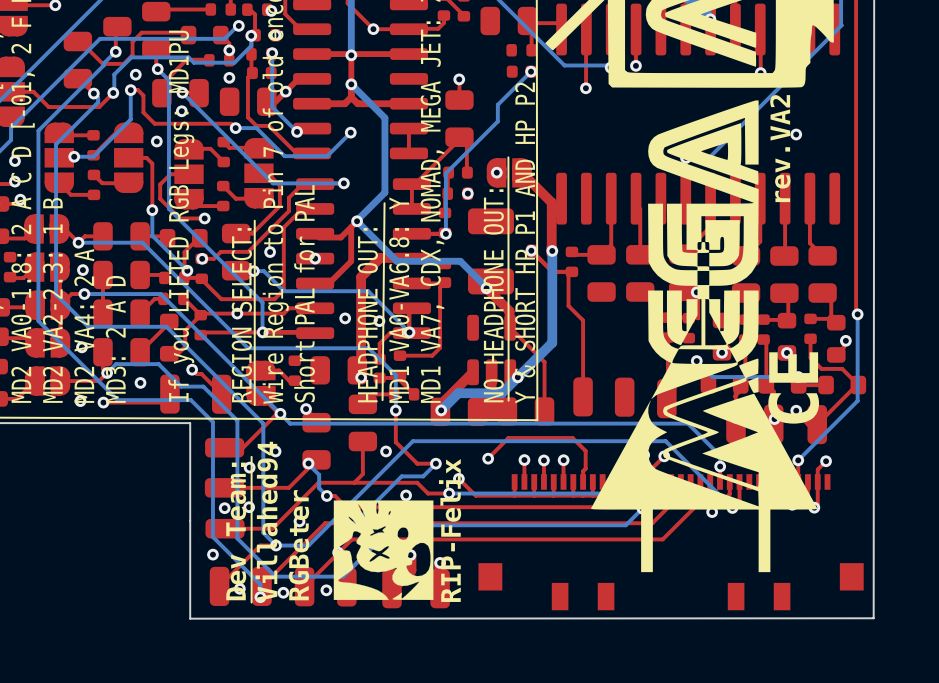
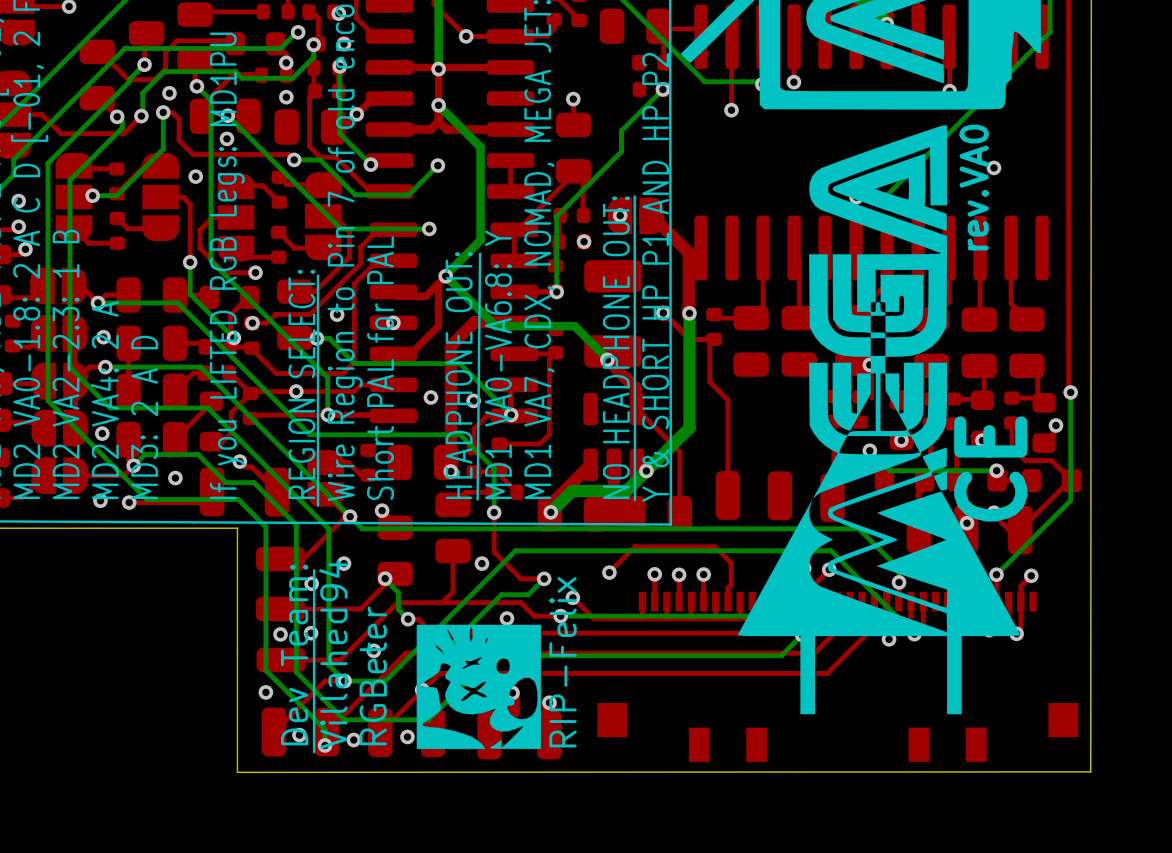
text: rev.VA2 (780, 148) -> rev.VA0 (974, 187)

